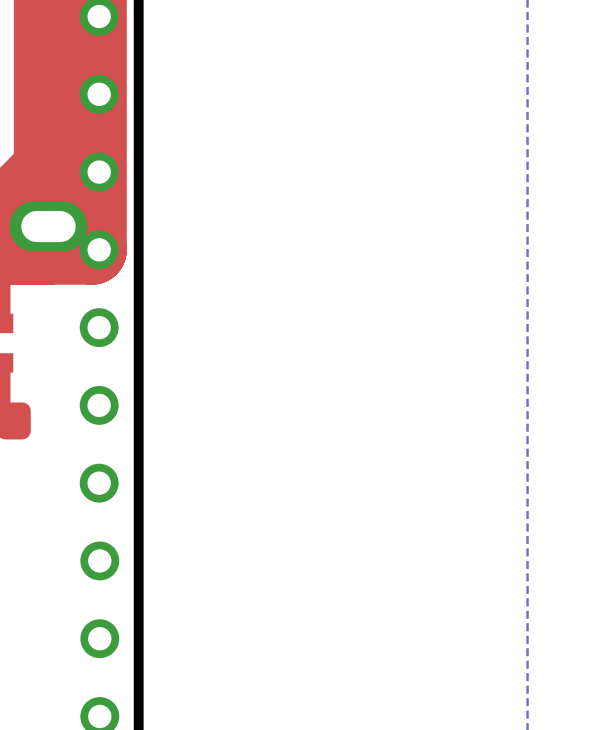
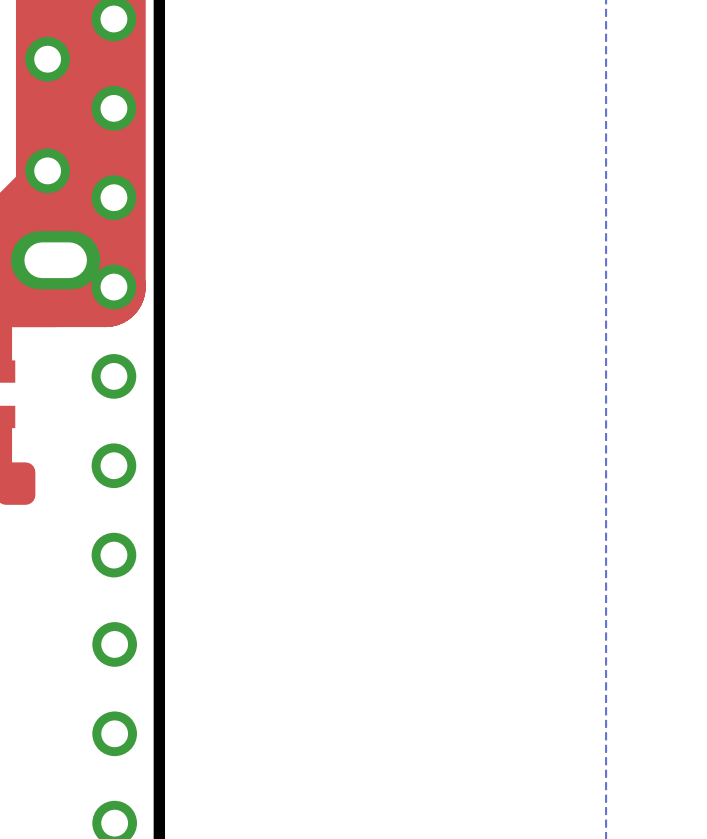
via: none -> (47, 59)
via: none -> (47, 170)

